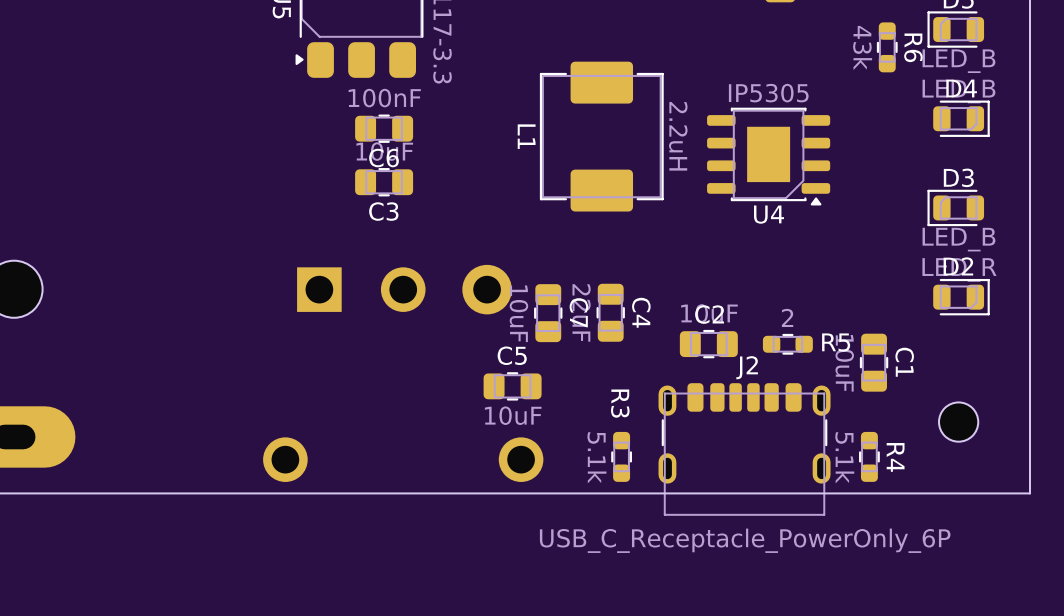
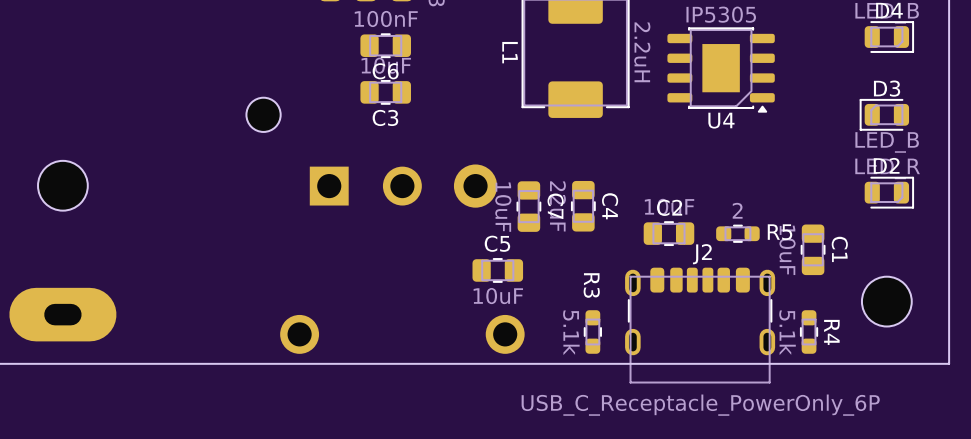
part: none -> (263, 114)
part footprint: [939, 402, 979, 442] -> [861, 276, 912, 327]

